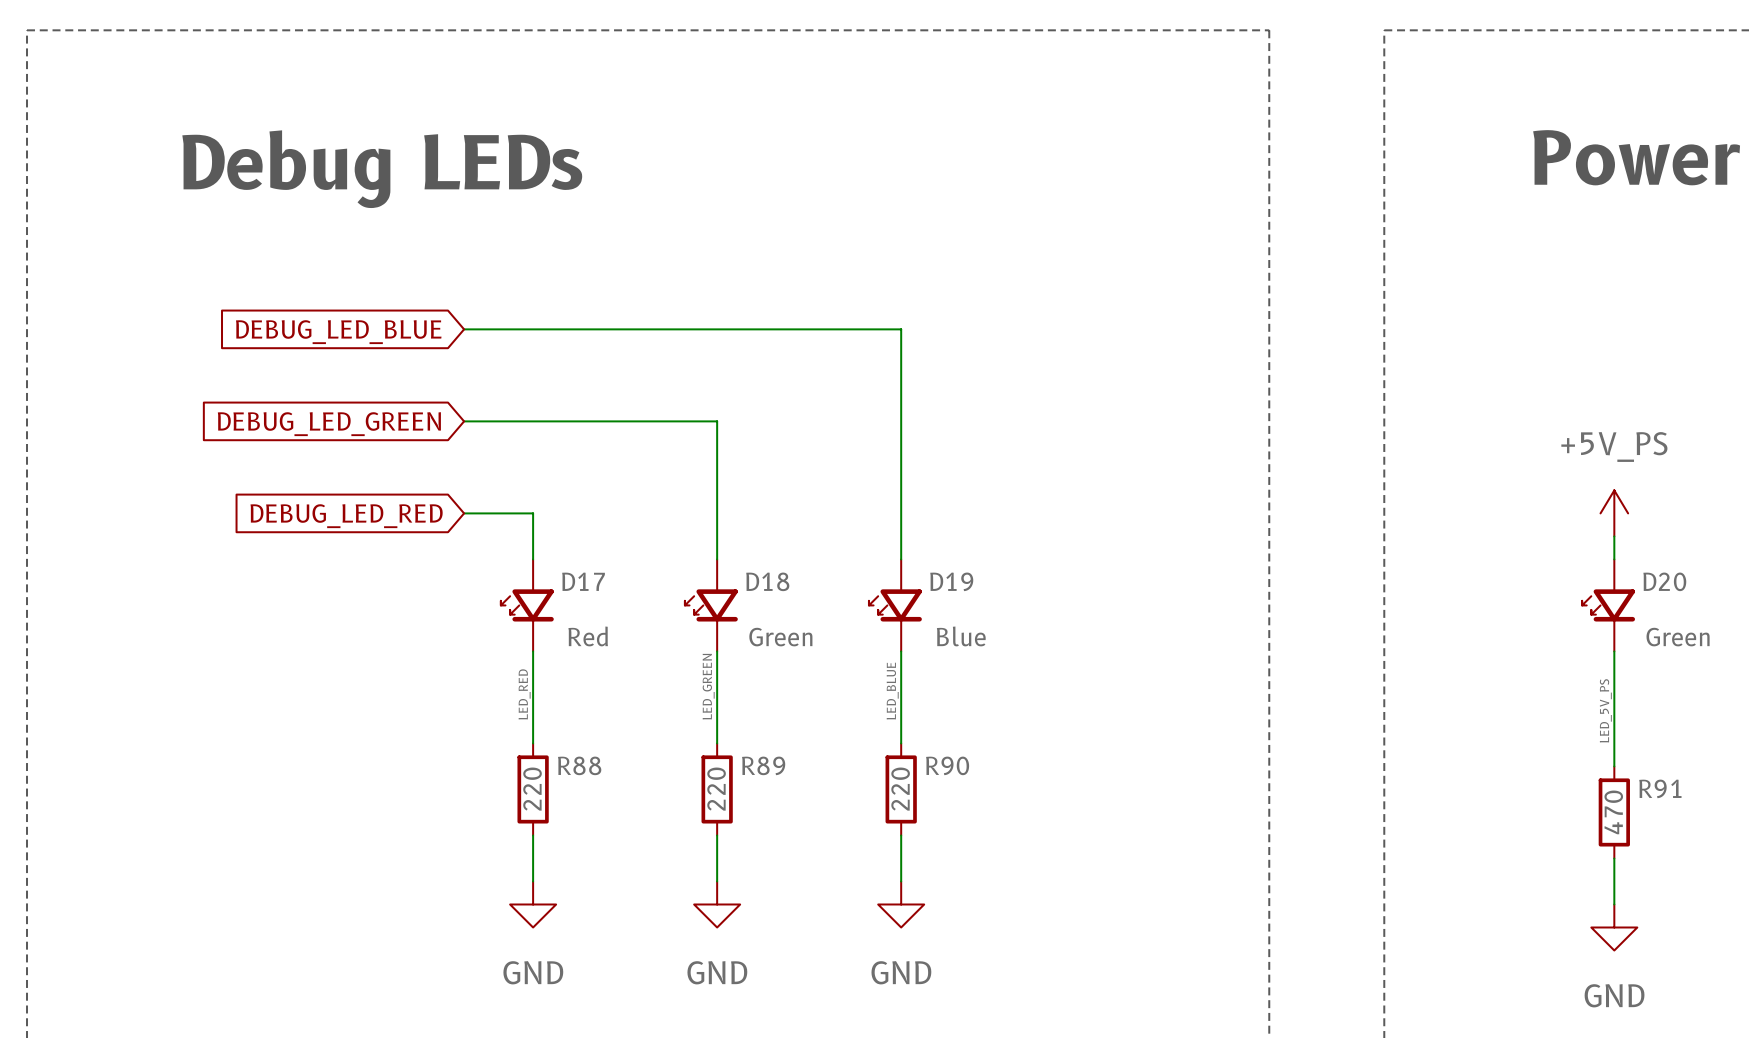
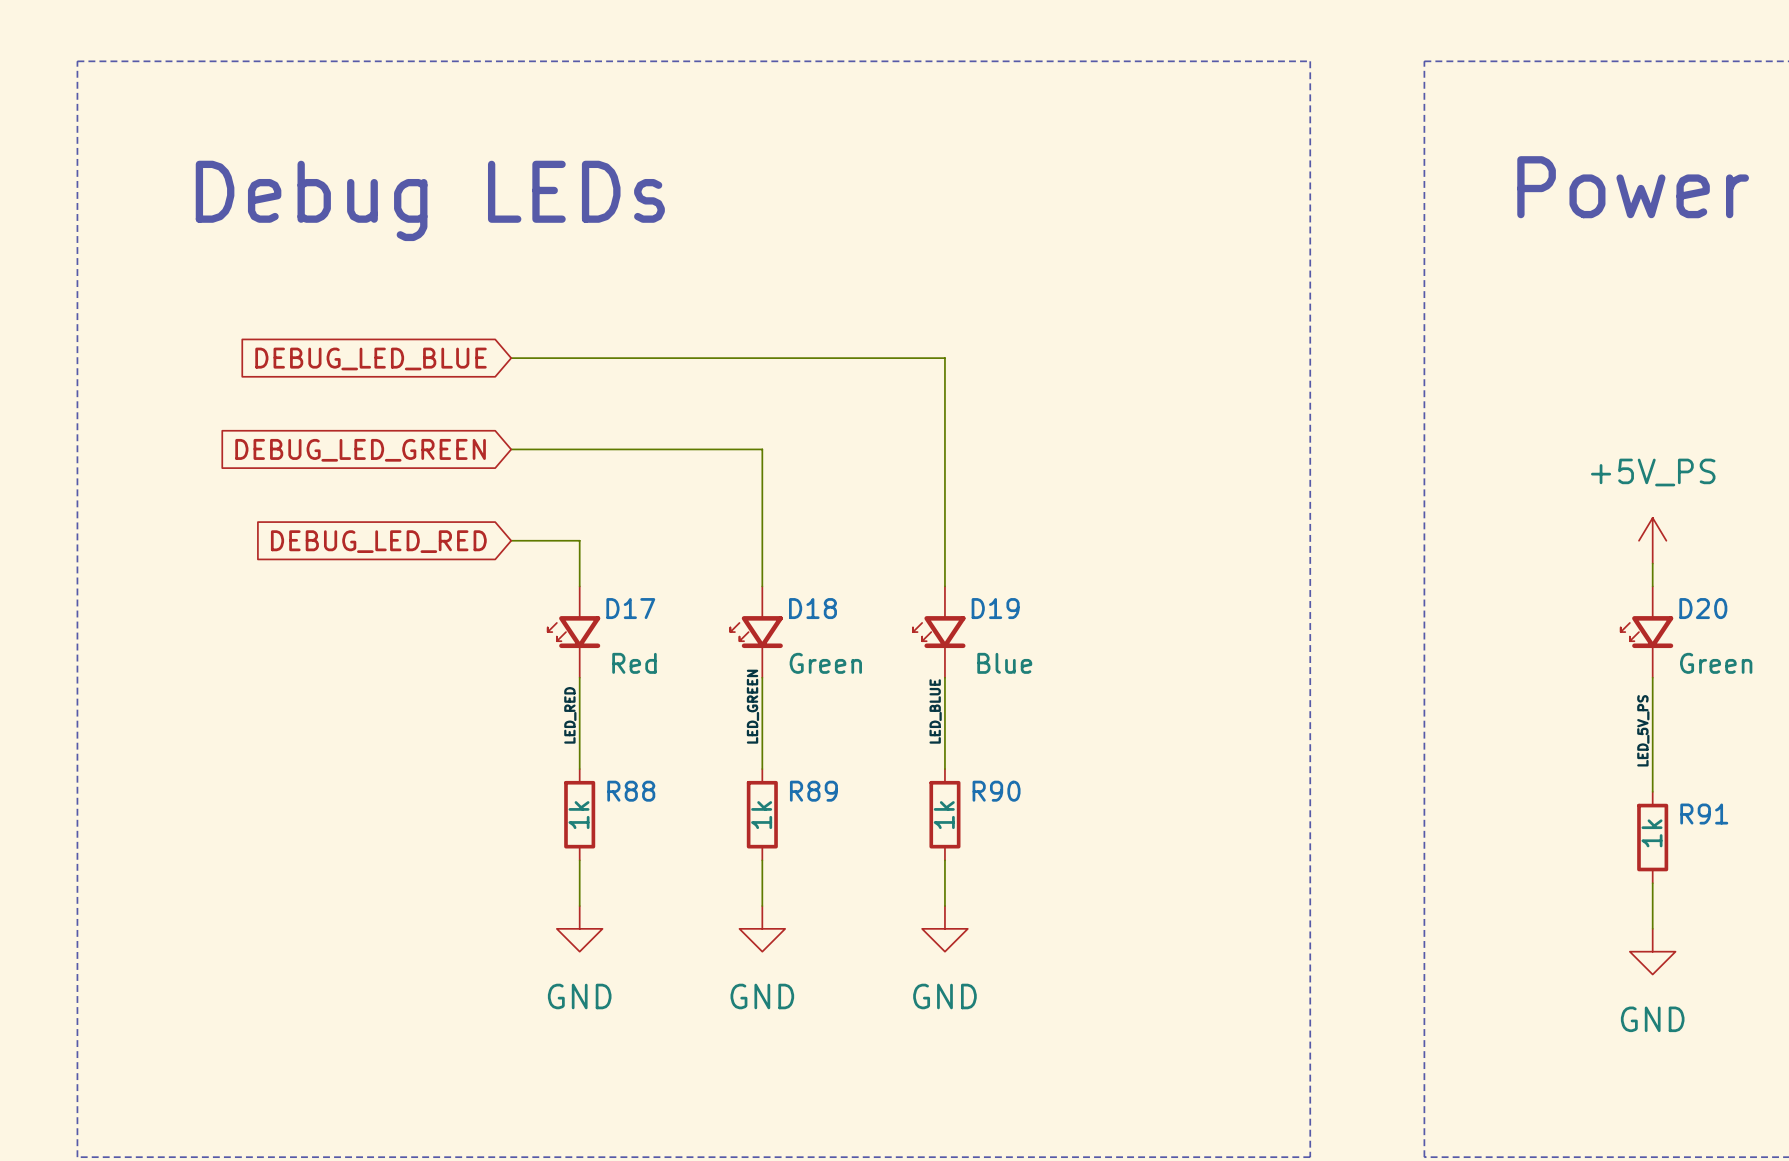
R88 value: 220 (532, 789) -> 1k (579, 815)
R89 value: 220 (716, 789) -> 1k (761, 815)
R90 value: 220 (900, 789) -> 1k (944, 815)
R91 value: 470 (1613, 812) -> 1k (1652, 833)

